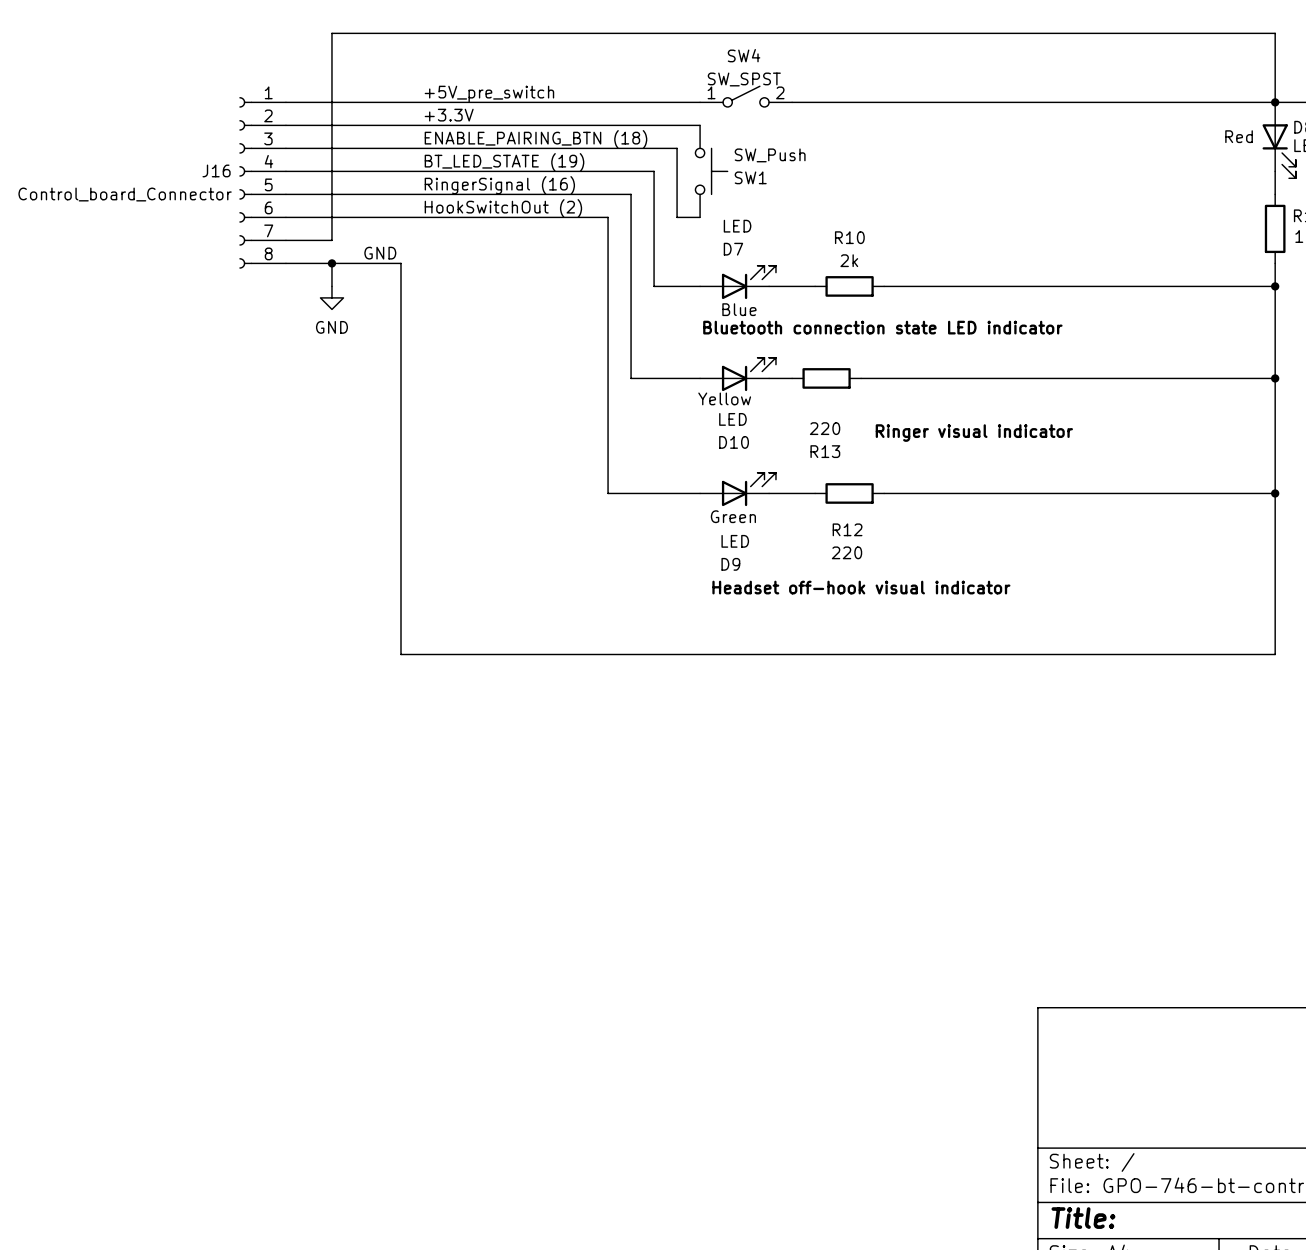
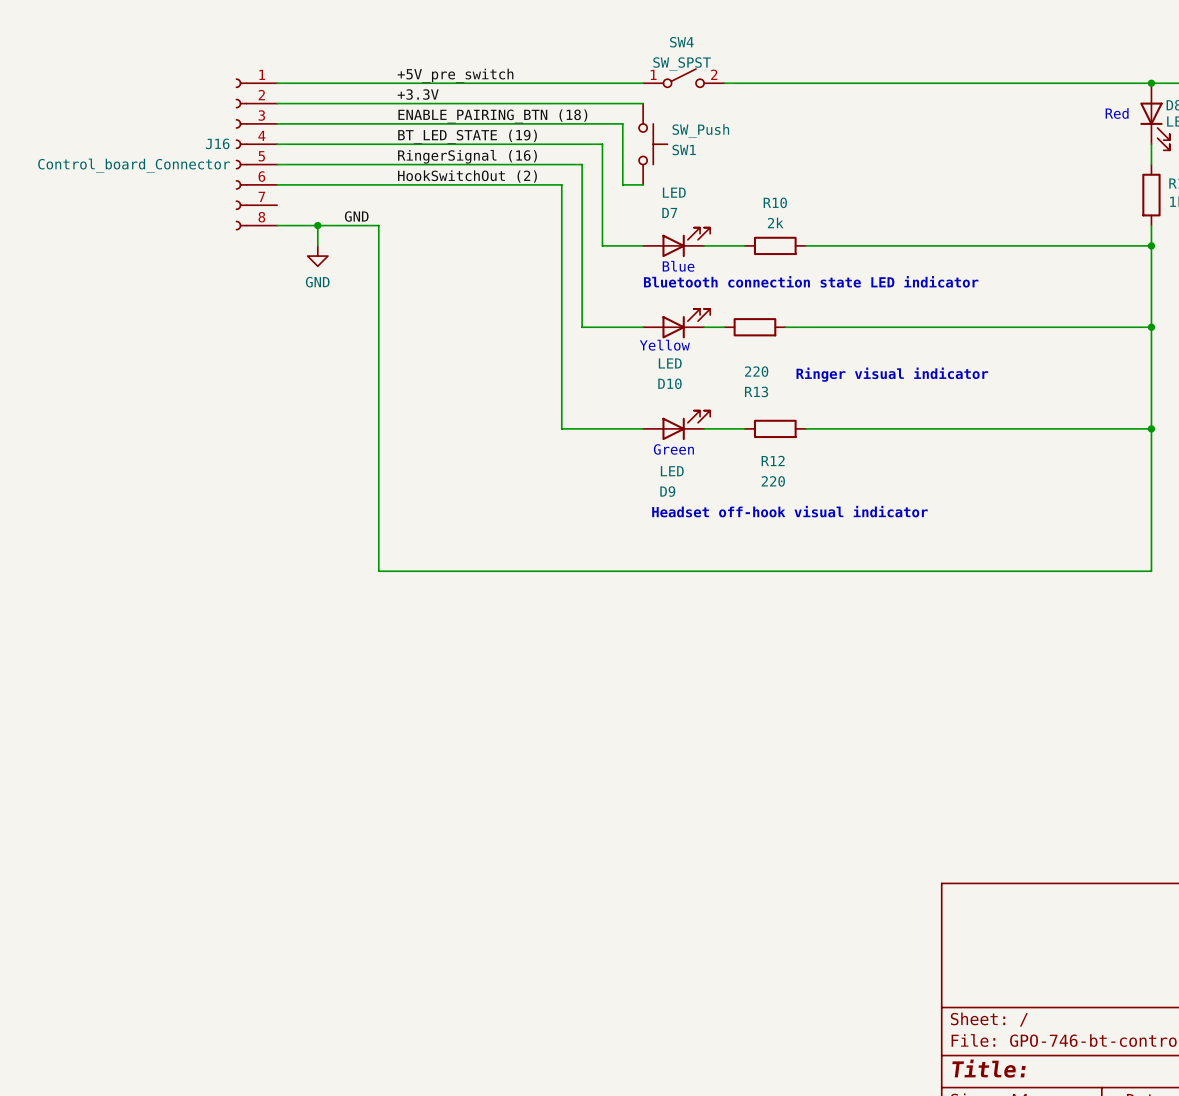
wire: (1275, 102) (1275, 33) (331, 33) (331, 240) (285, 240) -> none

